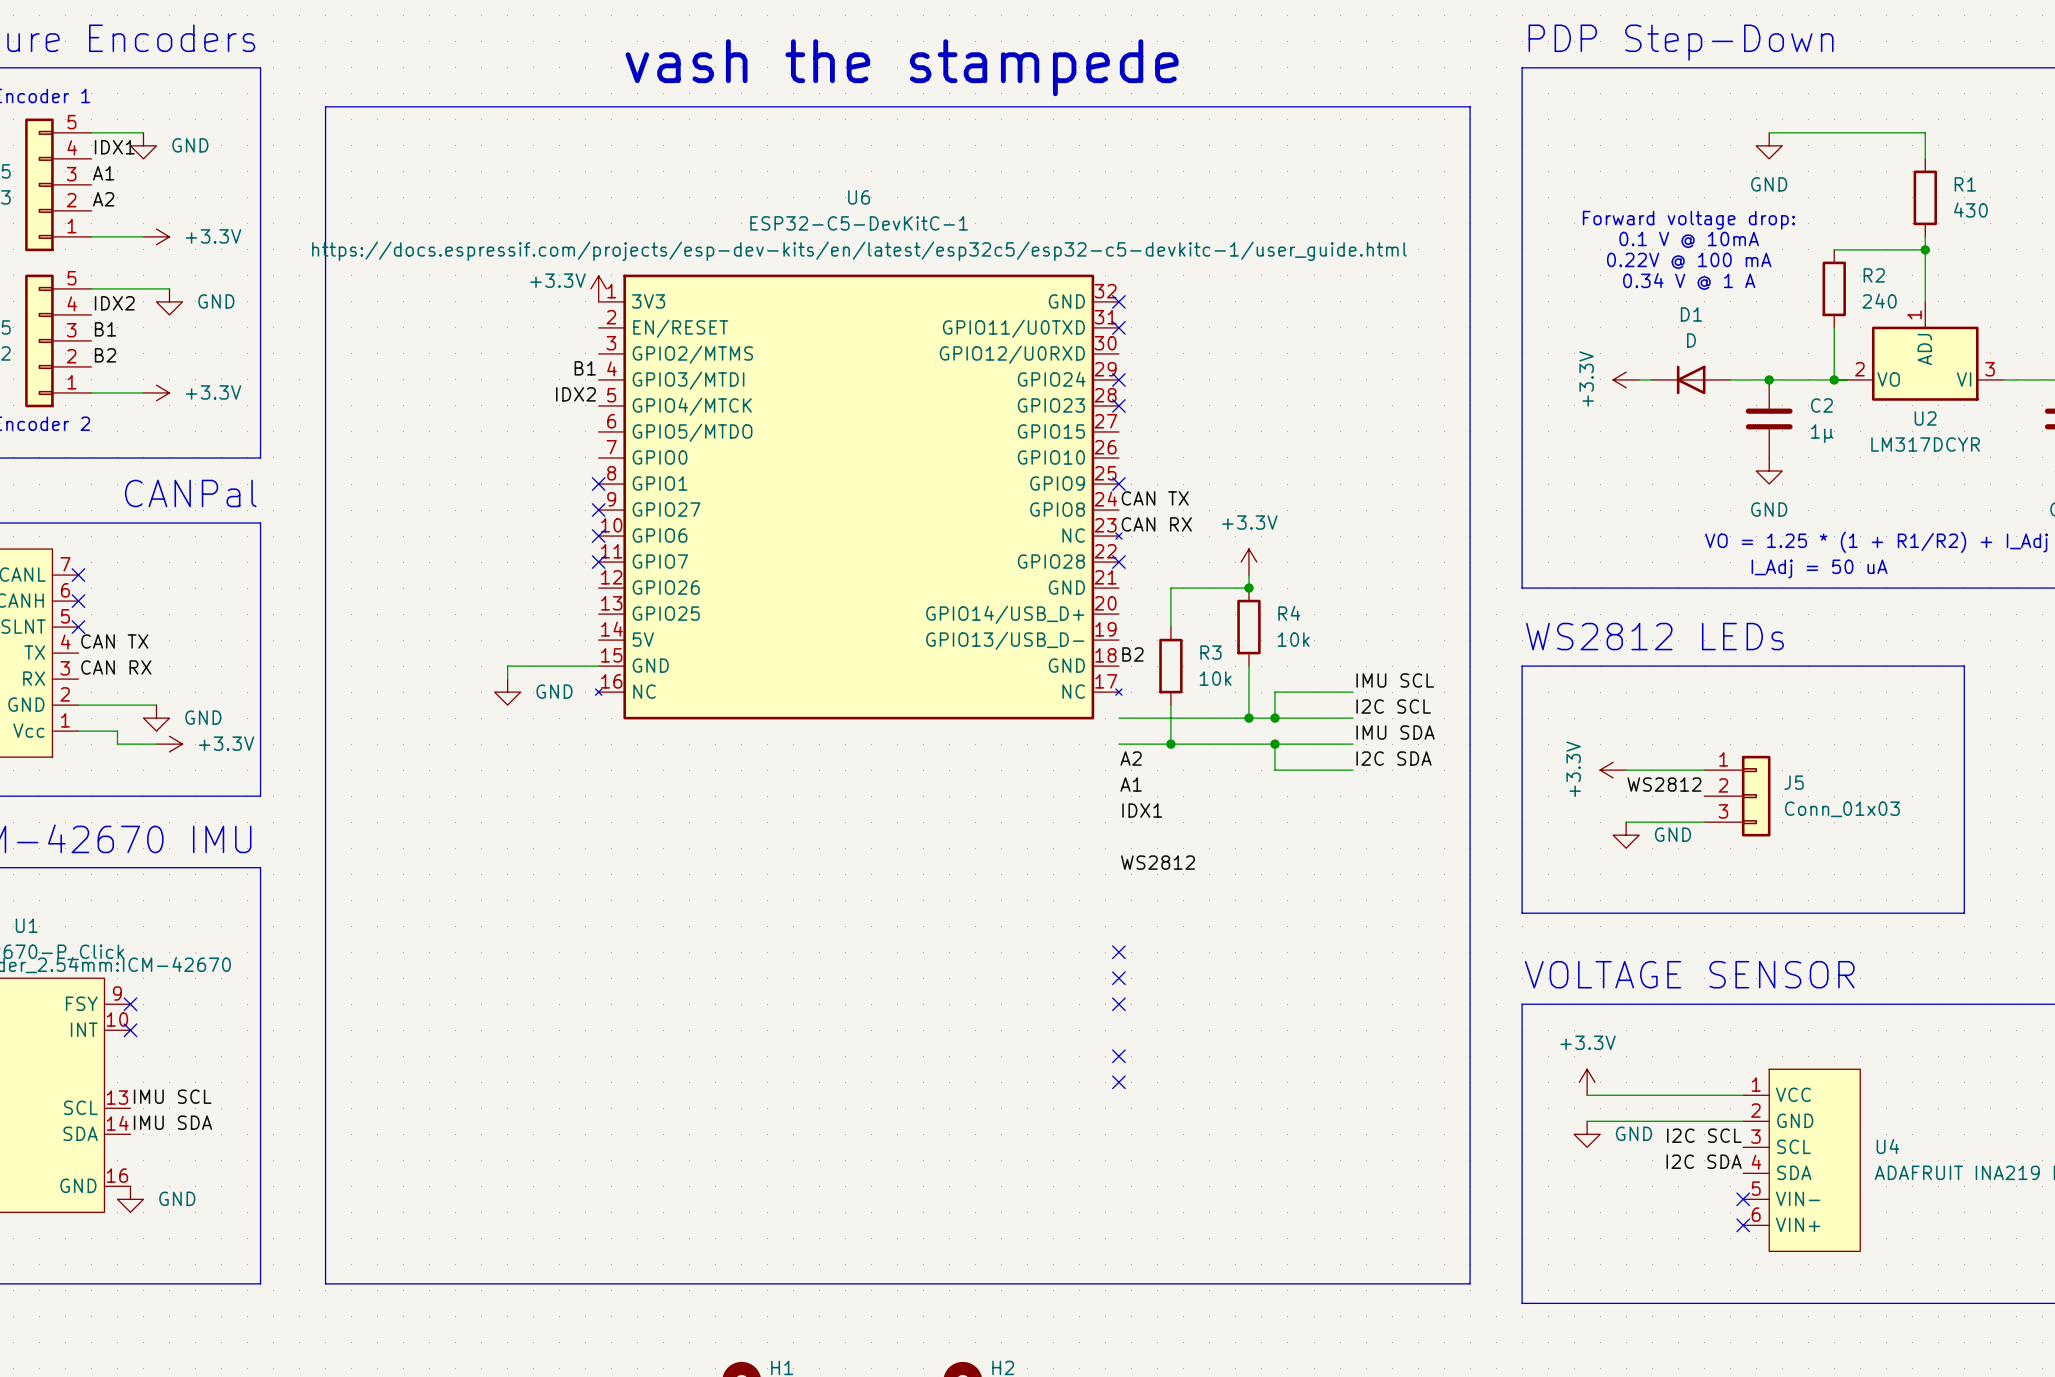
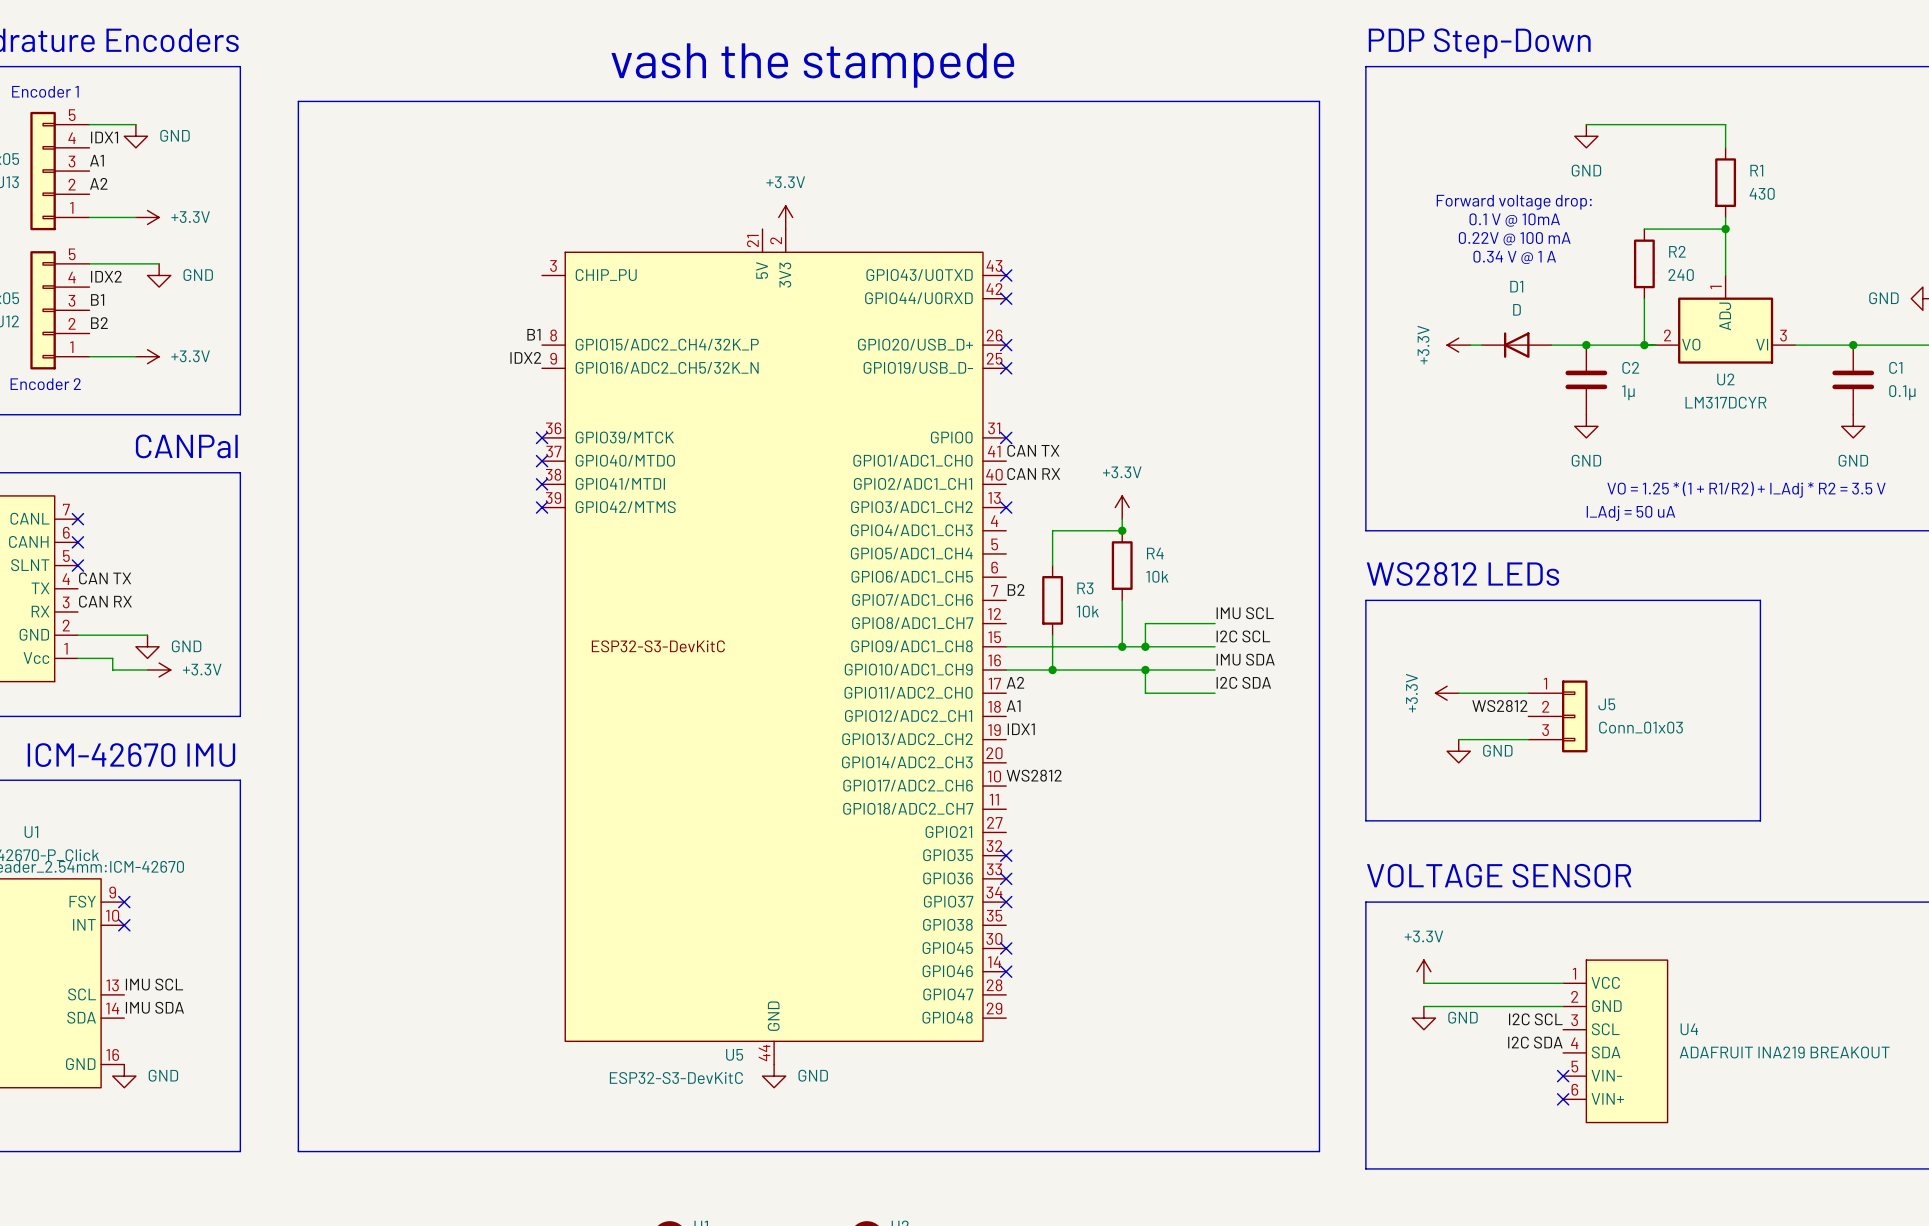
power symbol: none -> +3.3V (785, 217)
power symbol: +3.3V (598, 288) -> none
U6: ESP32-C5-DevKitC-1 (858, 497) -> none
wire: (598, 666) (507, 666) (507, 679) -> none
power symbol: GND (507, 692) -> none
U5: none -> ESP32-S3-DevKitC (774, 646)
power symbol: none -> GND (774, 1076)

